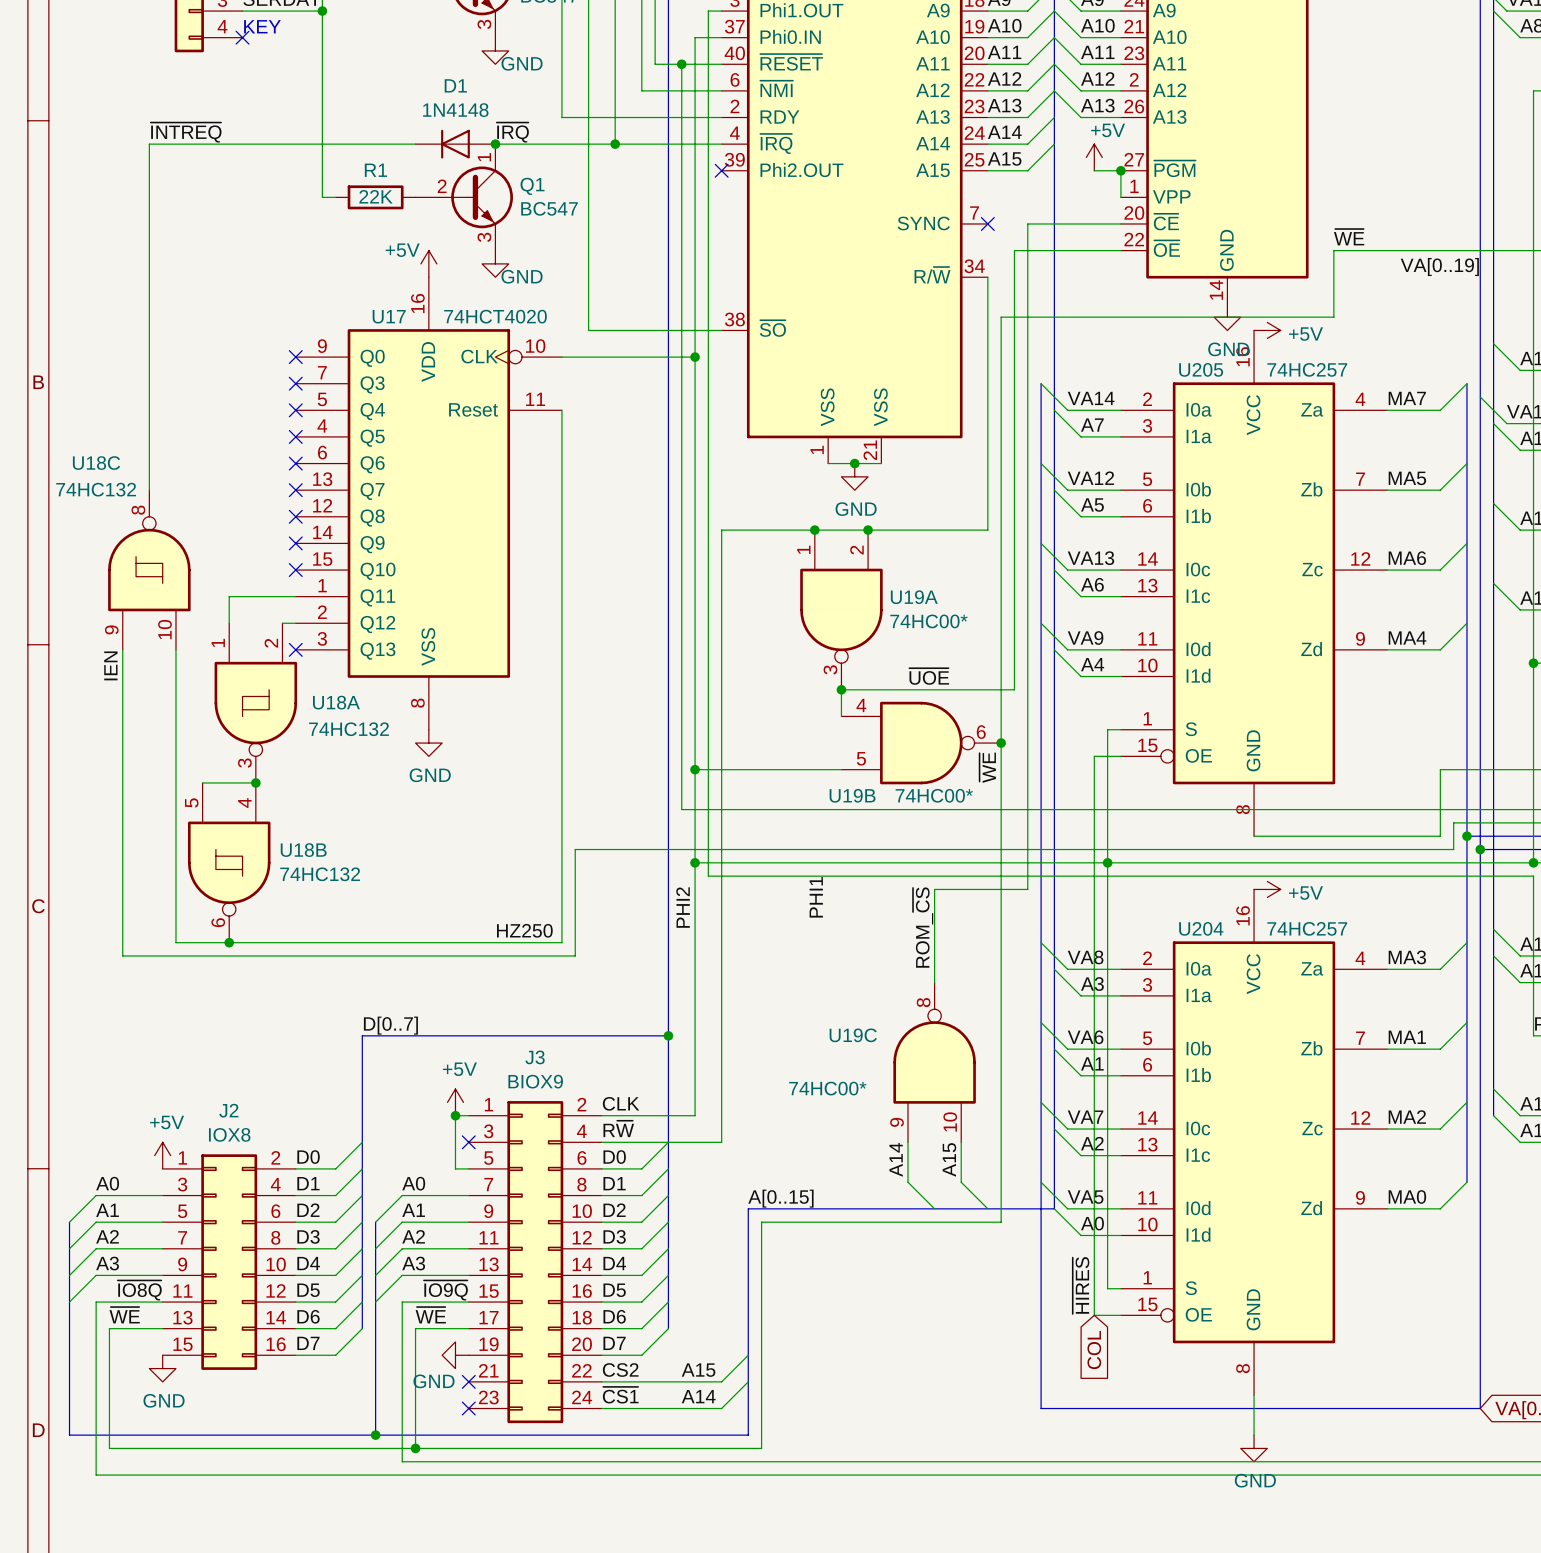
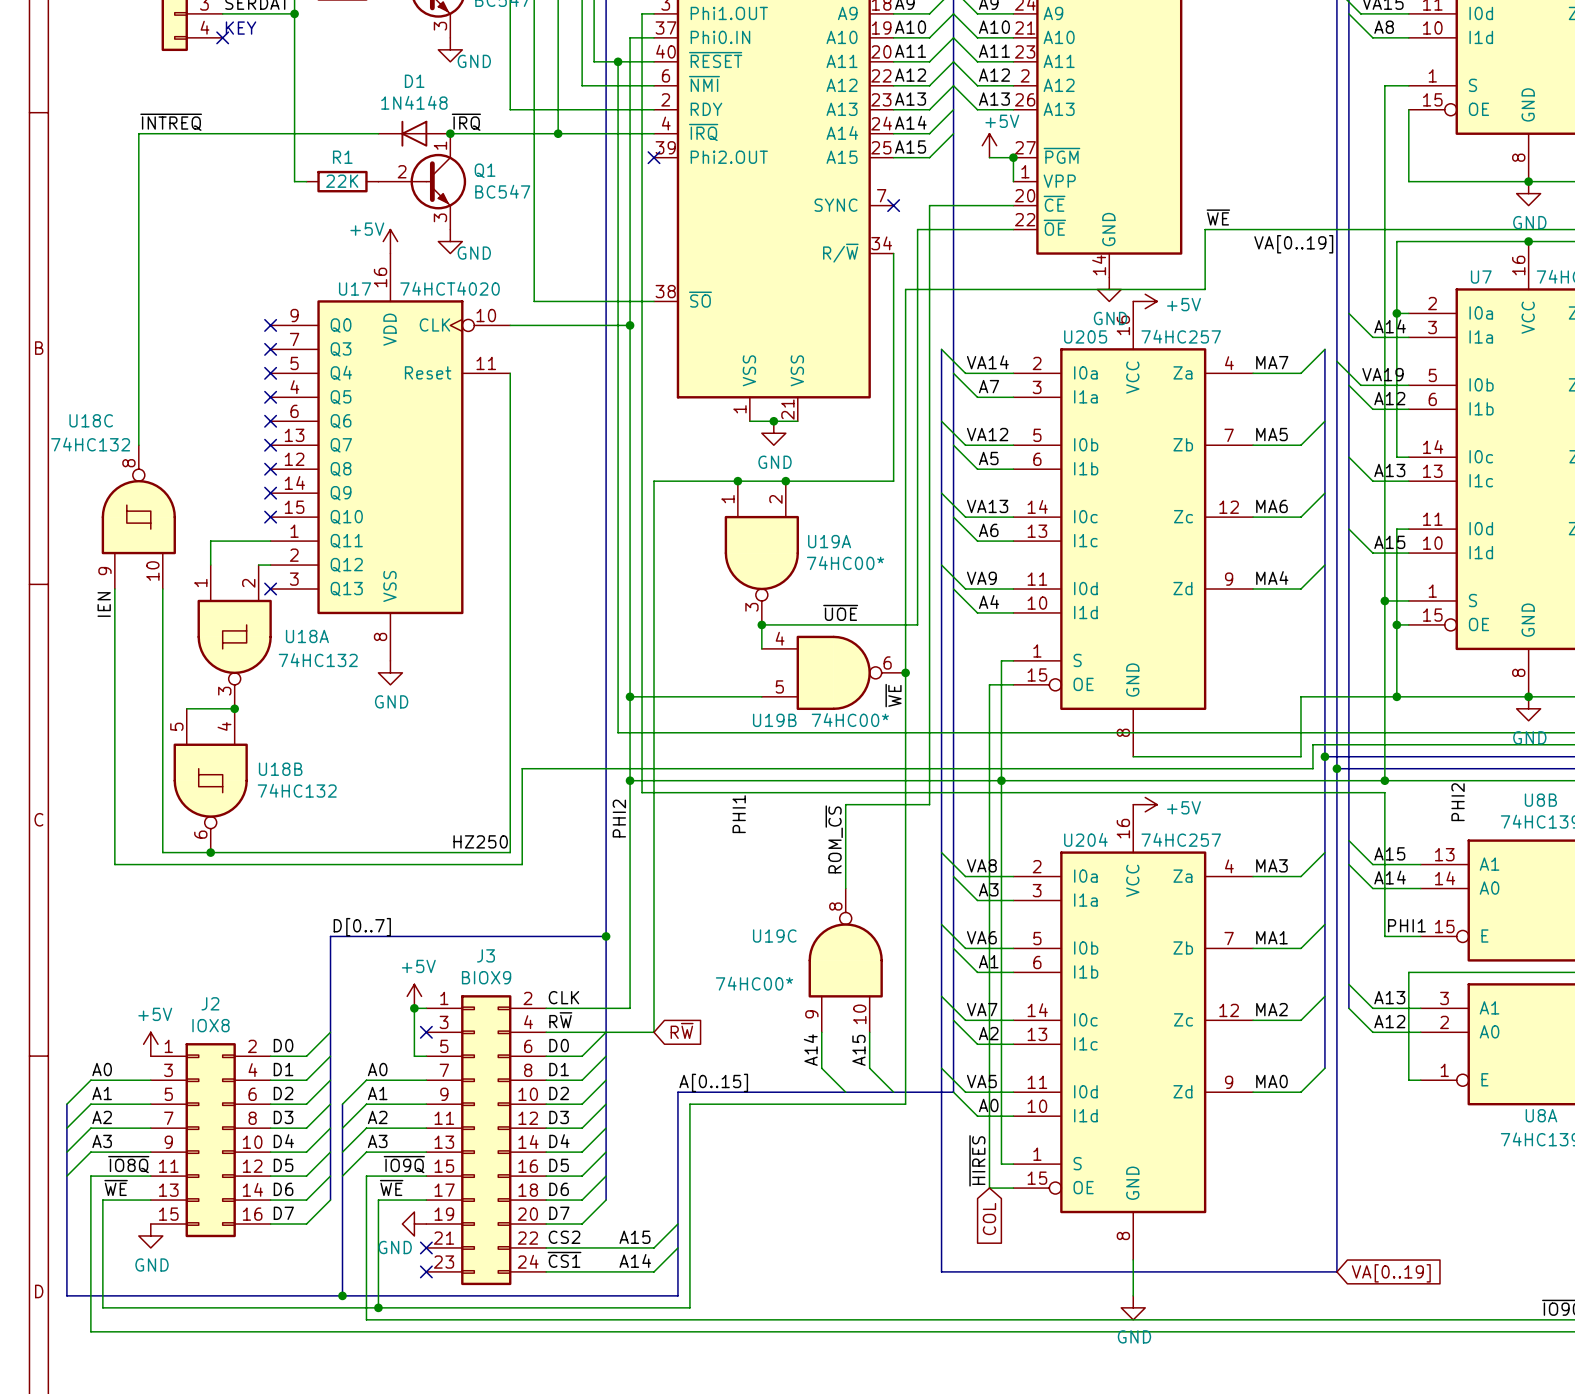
global label: none -> R~{W} (682, 1030)

